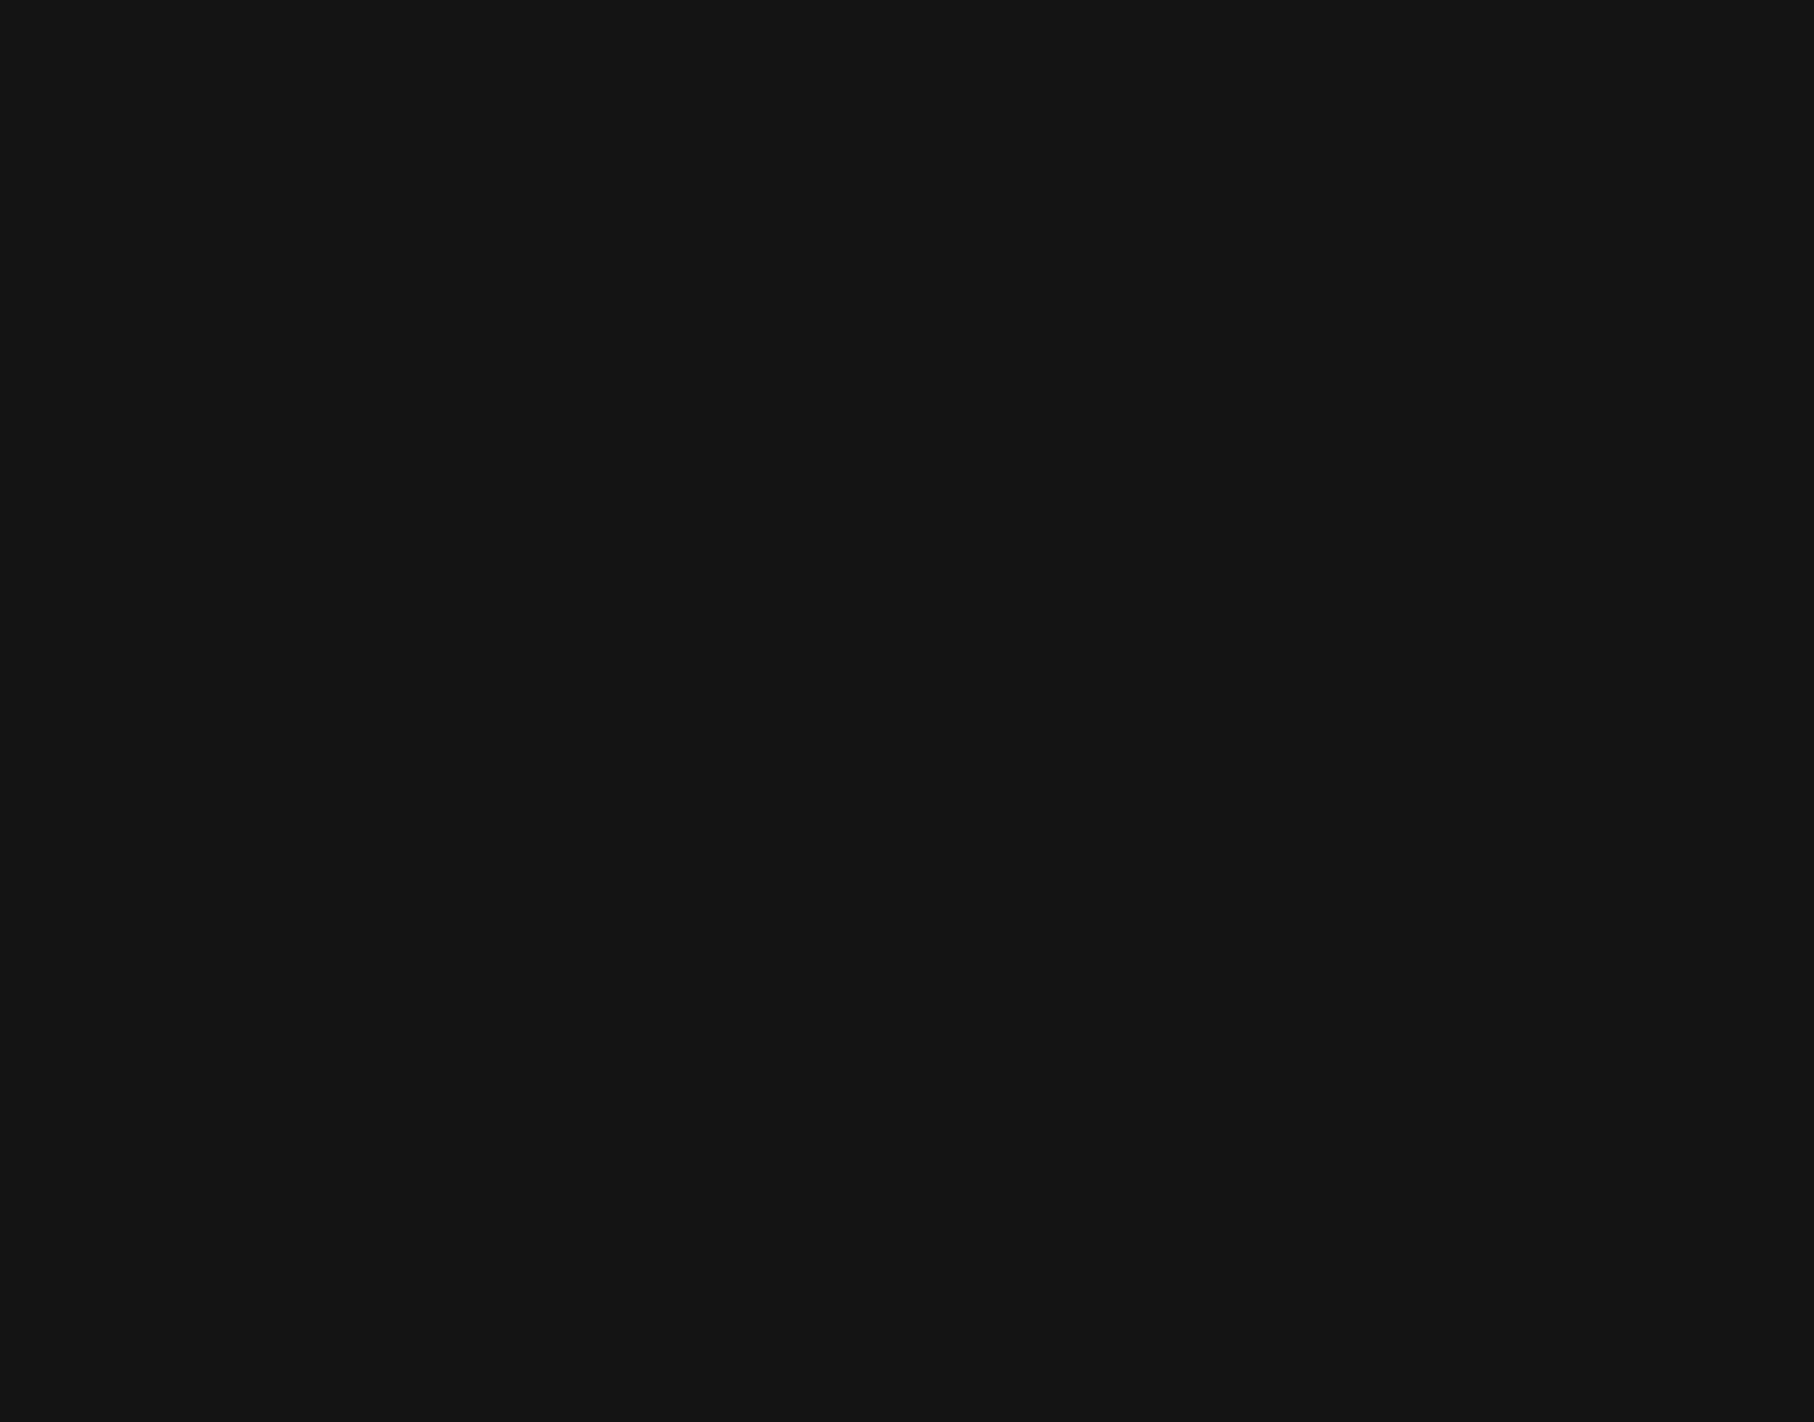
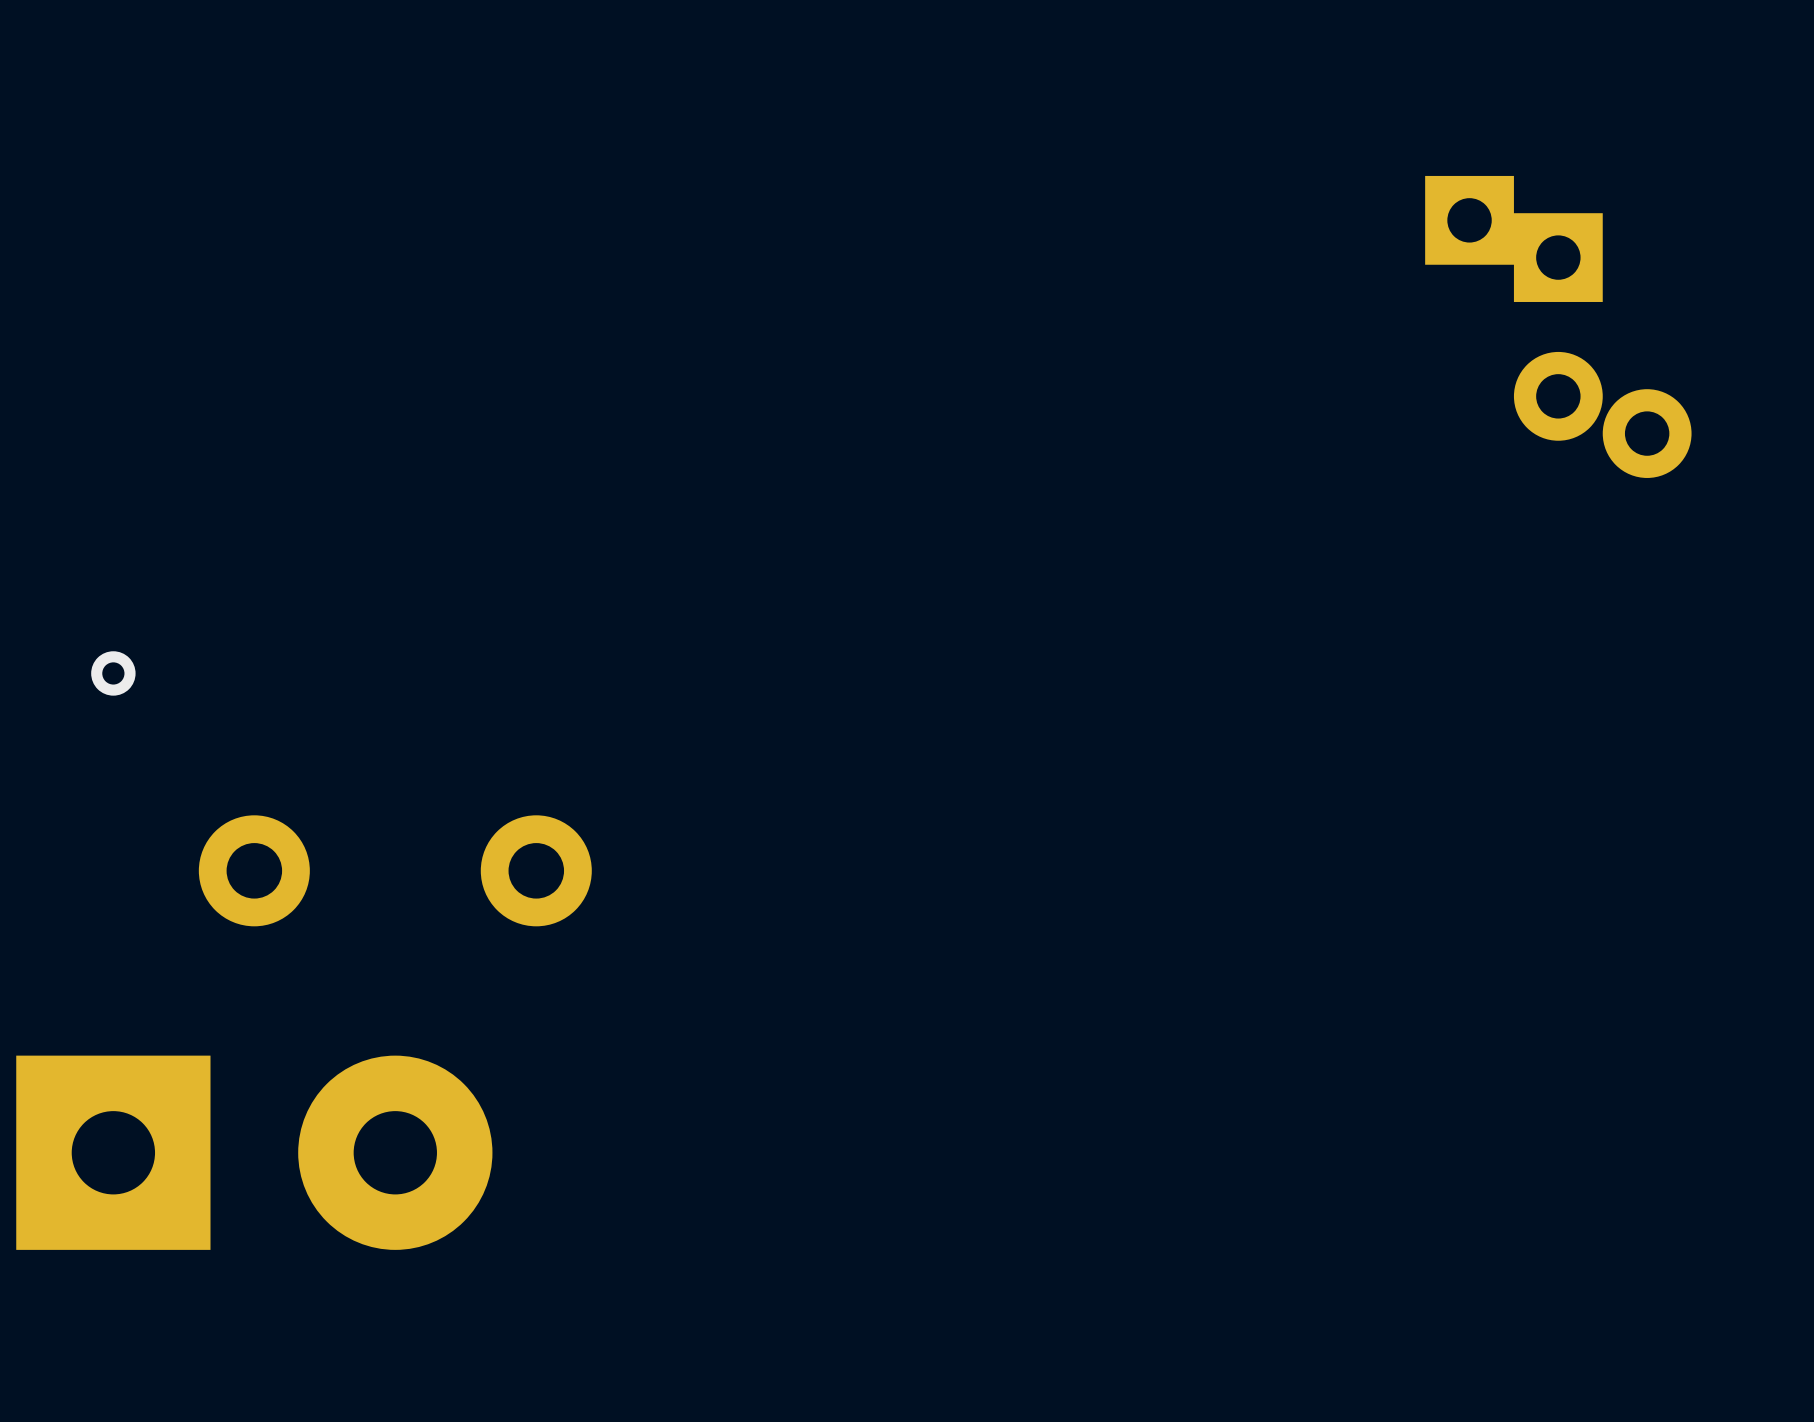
part: none -> (1558, 326)
via: none -> (113, 673)
part: none -> (254, 870)
part: none -> (536, 870)
part: none -> (254, 1152)

